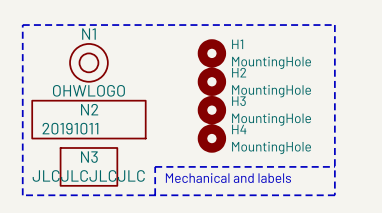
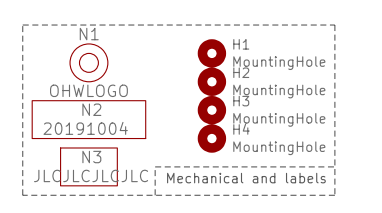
N2 value: 20191011 (70, 128) -> 20191004 (85, 128)

